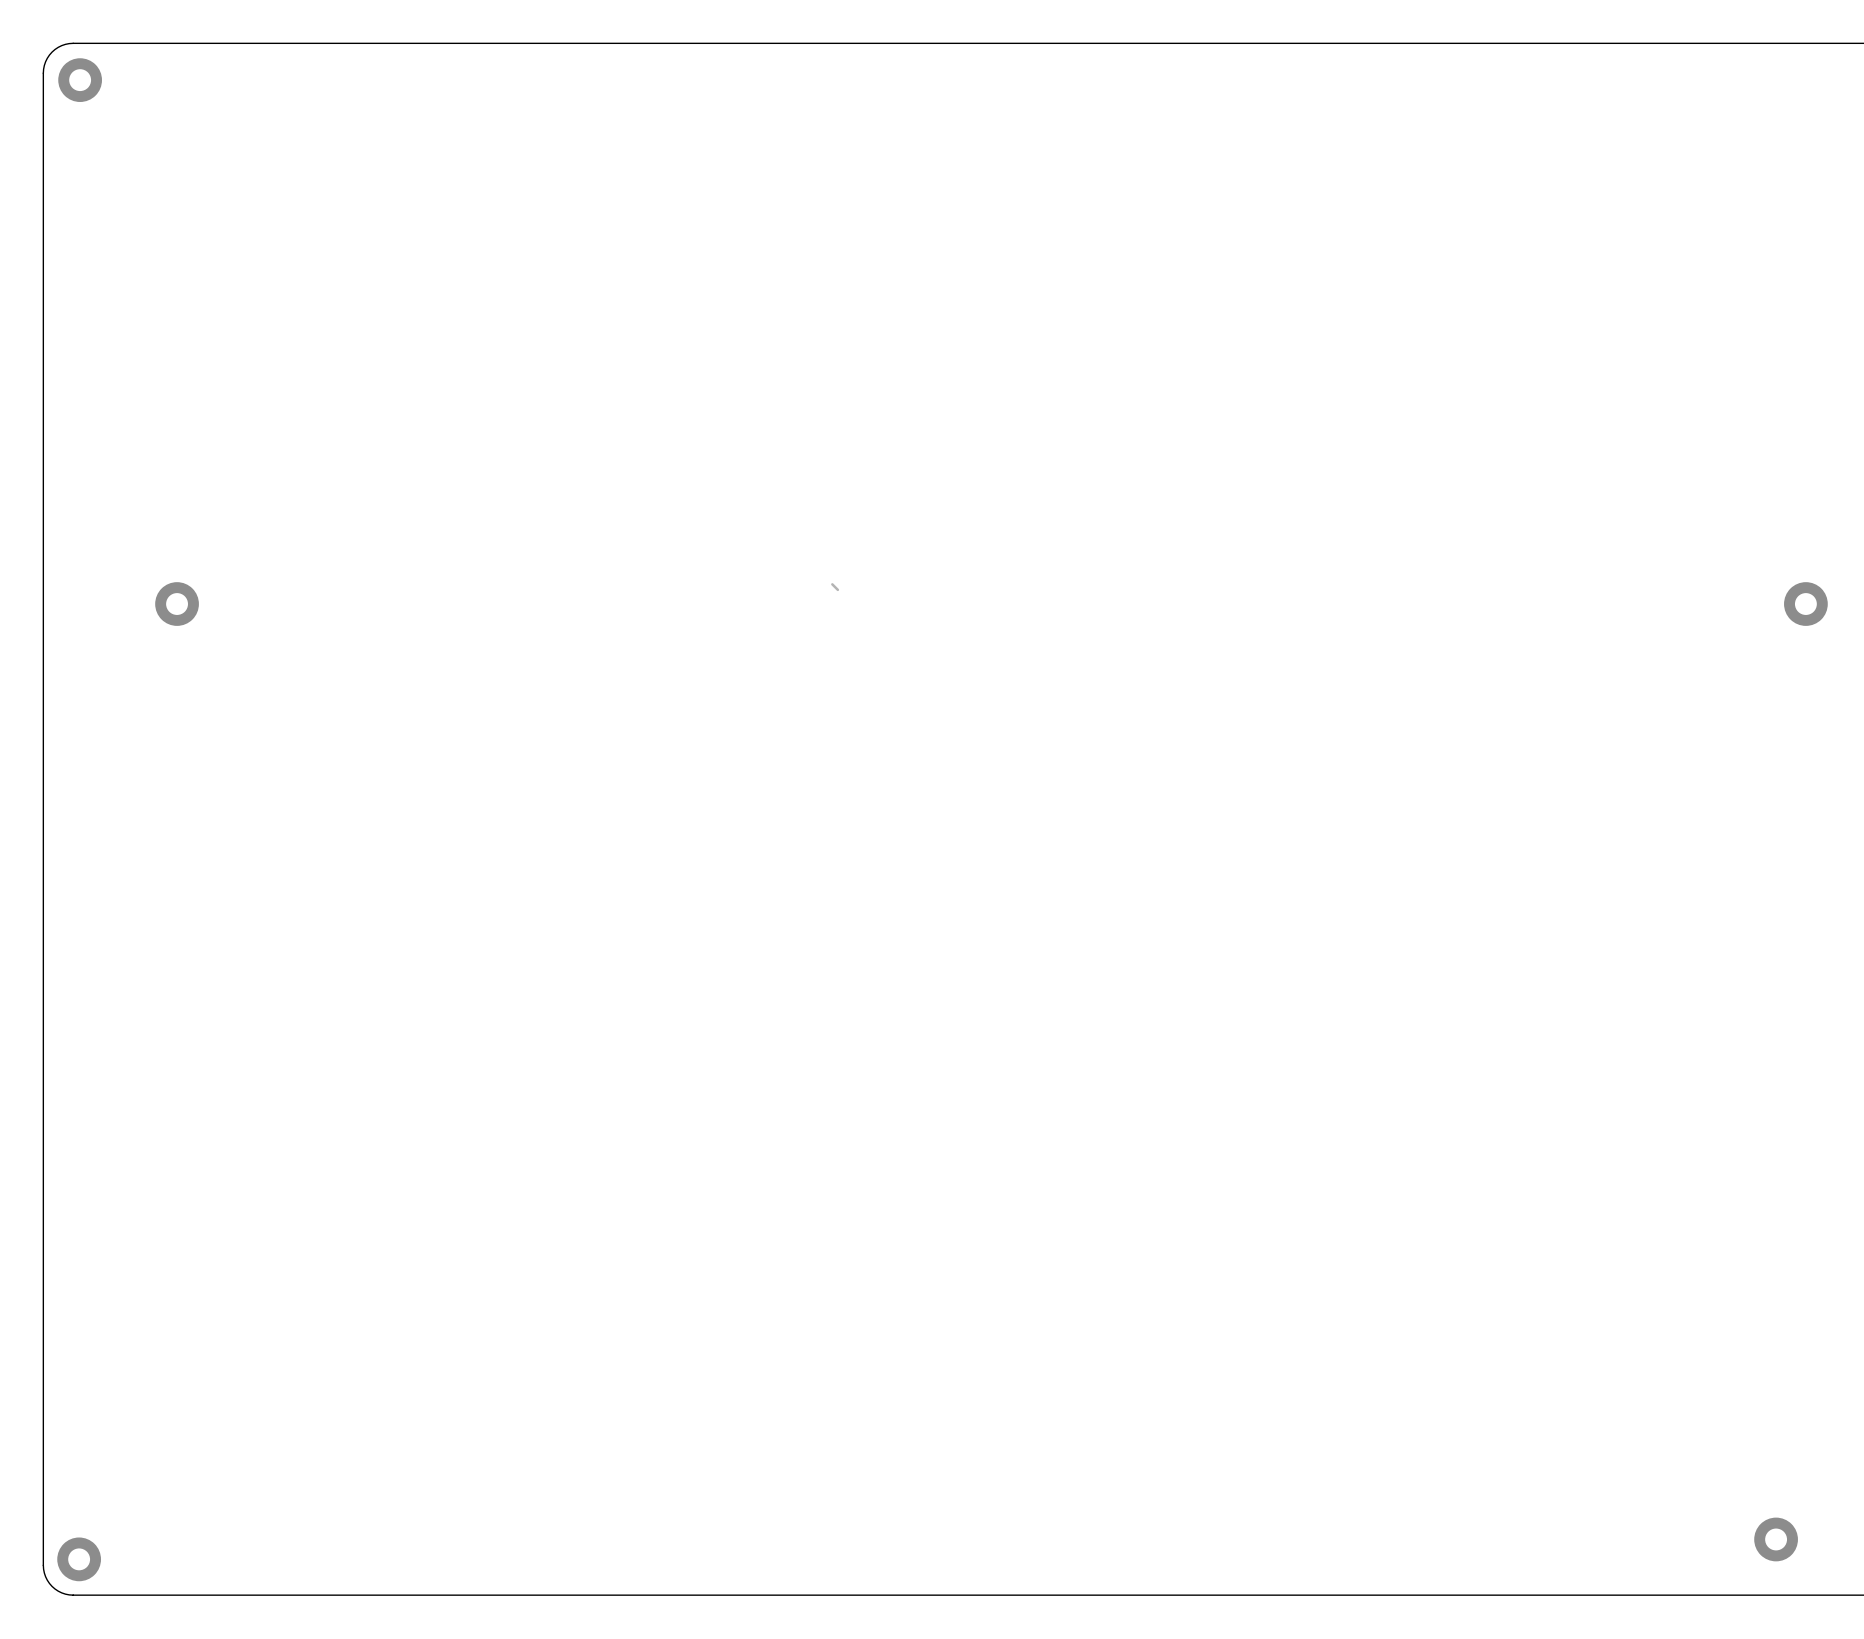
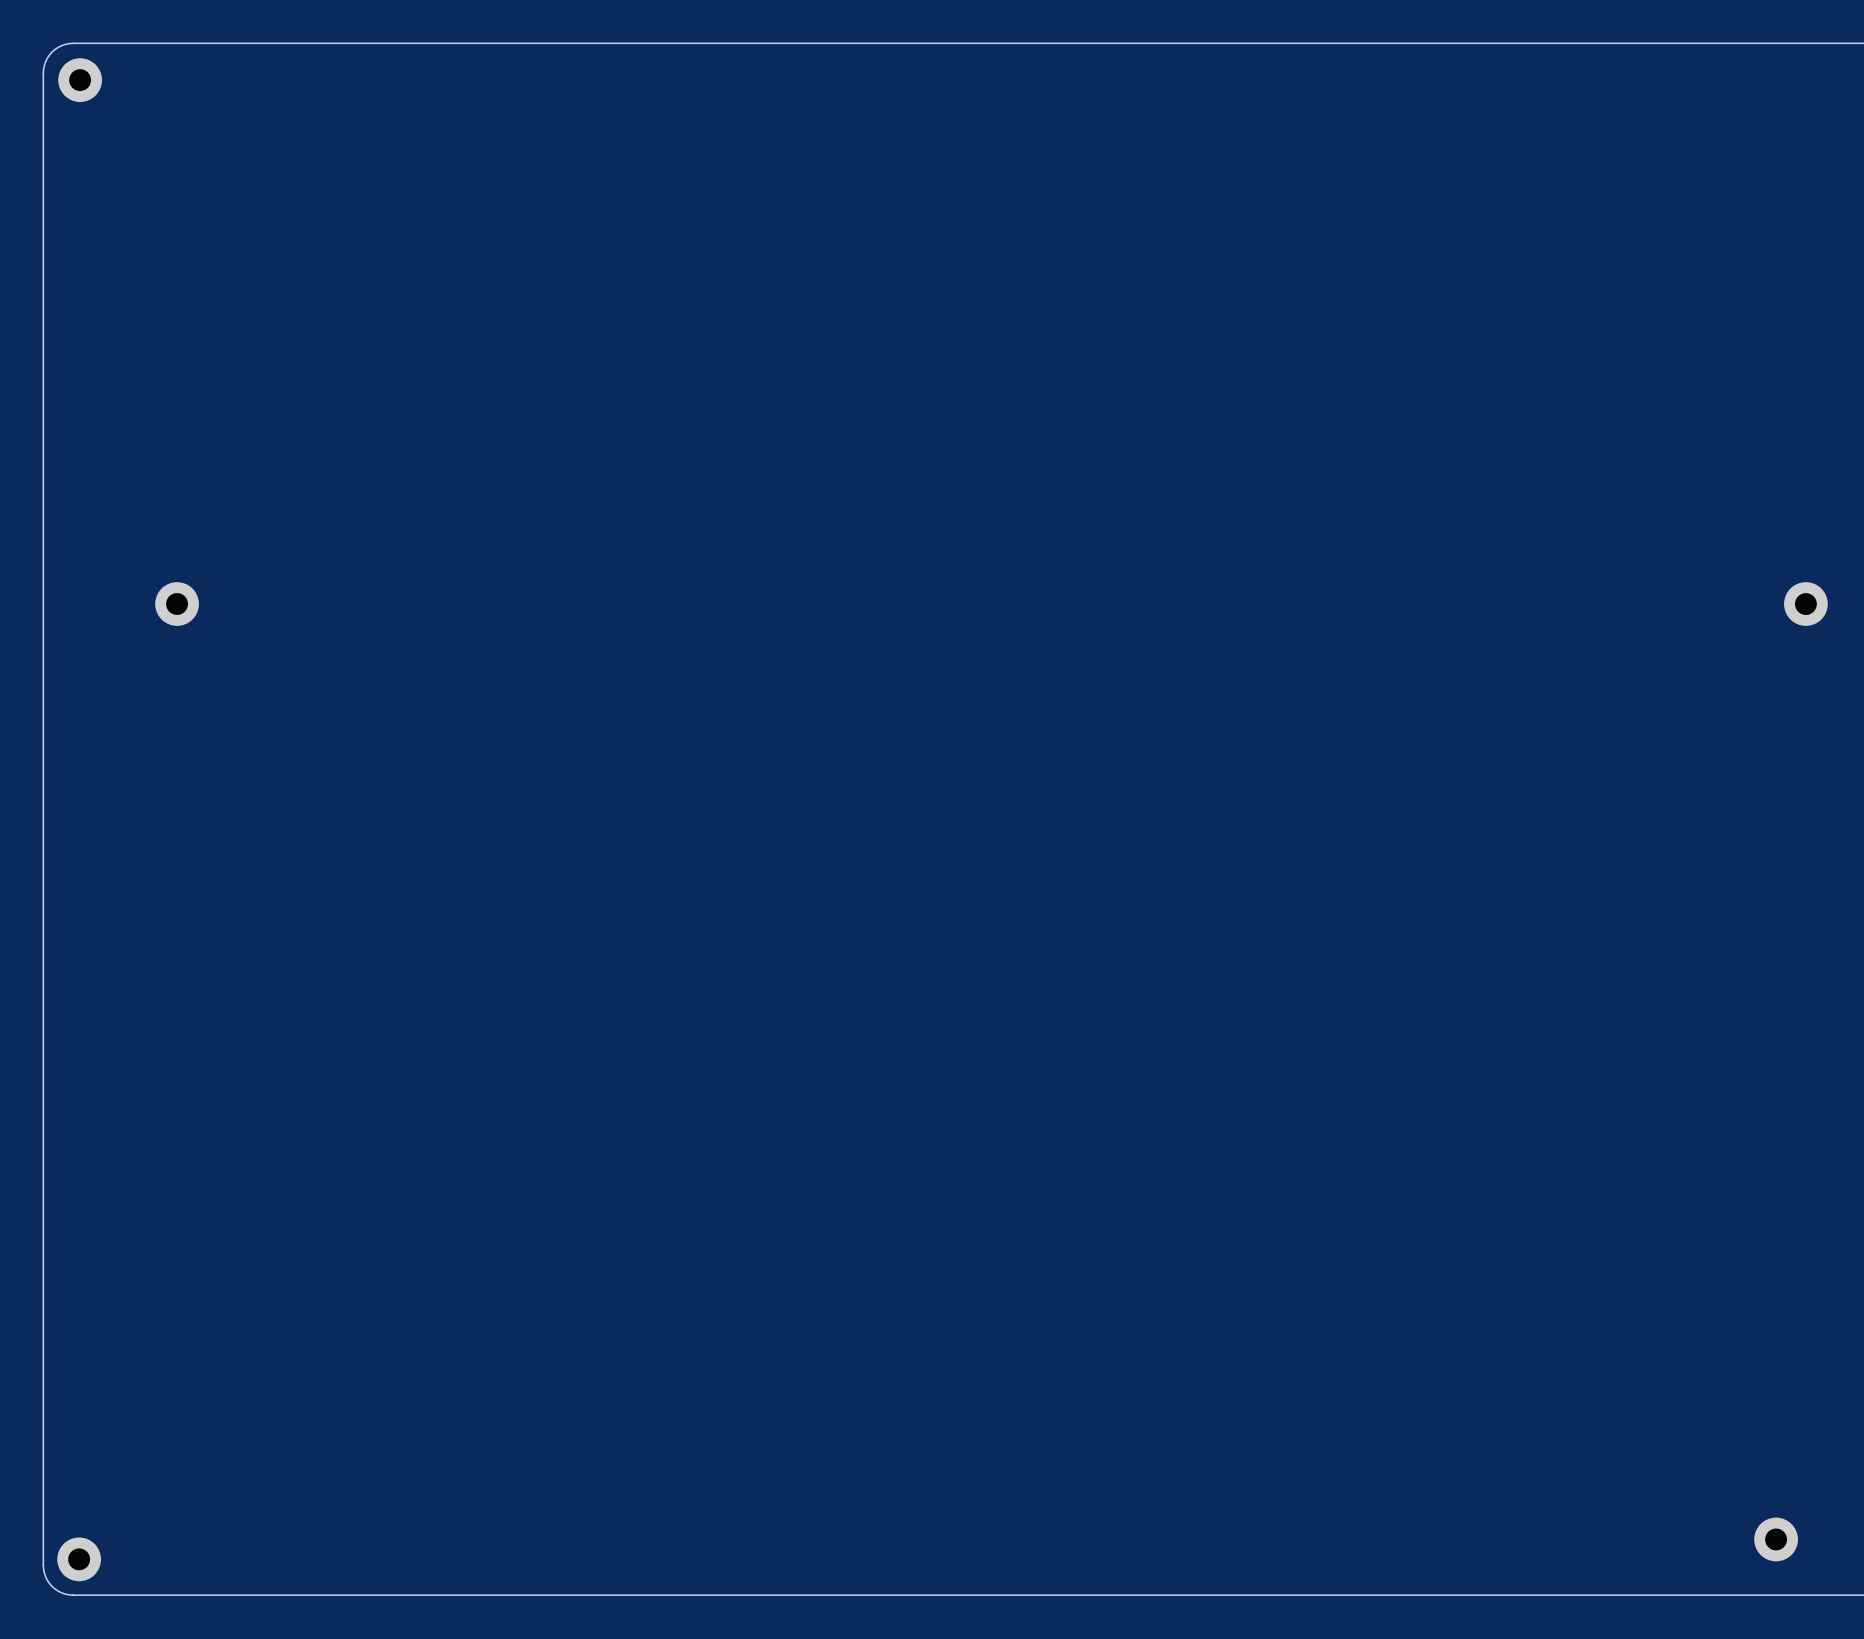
track: (832, 584) (837, 589) -> none

